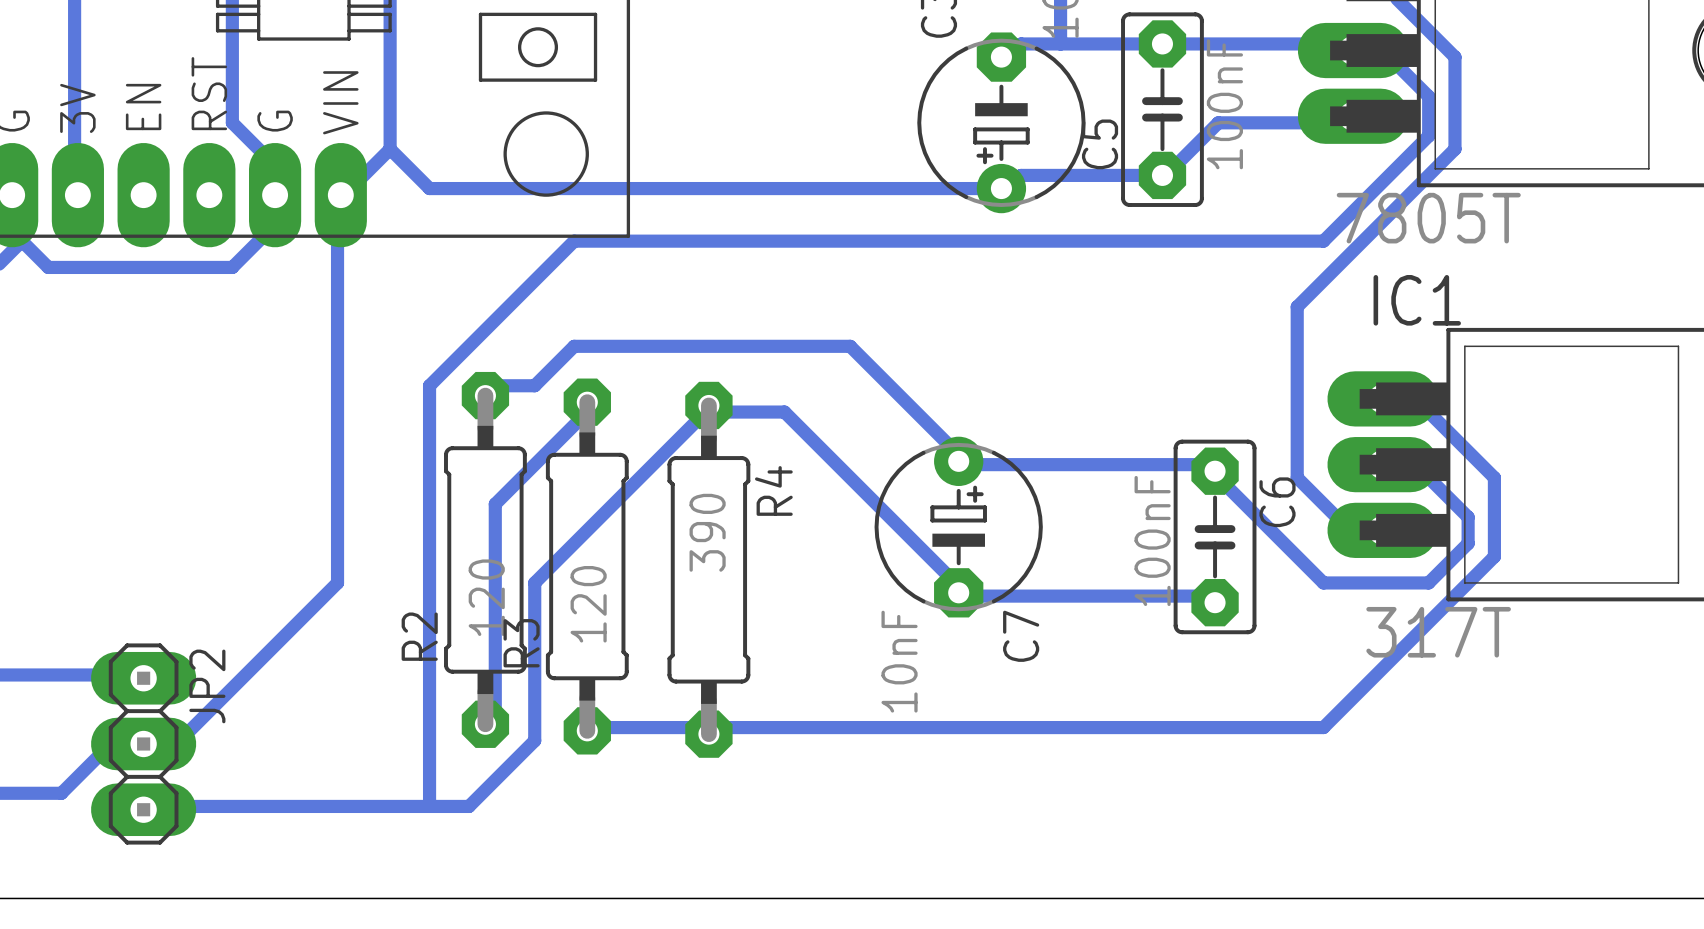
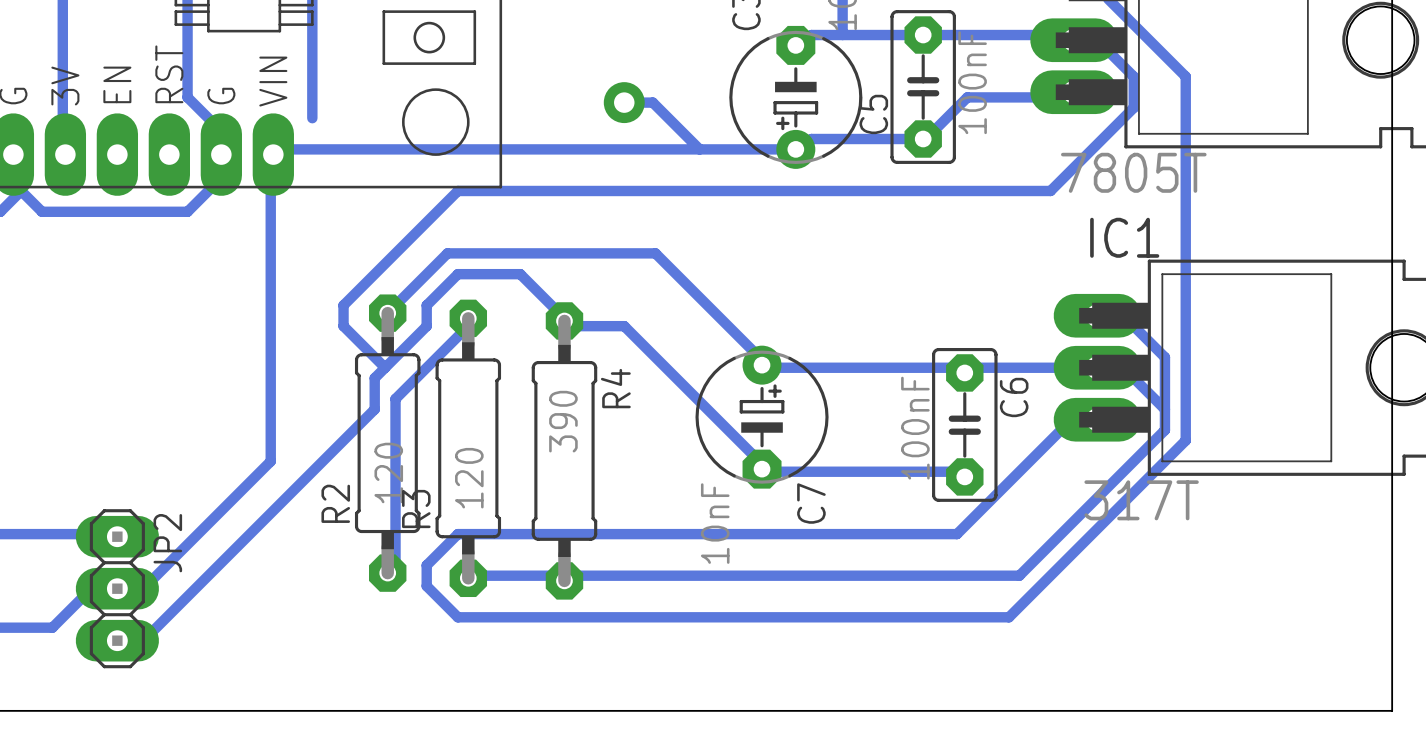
bottom track: (1454, 57) (1454, 149) (1297, 306) (1297, 477) (1349, 530) -> (1154, 45) (1185, 76) (1185, 378)
bottom track: none -> (624, 102) (652, 102) (699, 149)
via: none -> (624, 102)
bottom track: (350, 188) (390, 149) (429, 188) -> (281, 149) (343, 149)
bottom track: (653, 346) (850, 346) -> (520, 274) (561, 315) (564, 320)
bottom track: (495, 385) (534, 385) -> (395, 305) (447, 253) (655, 253) (676, 274)
bottom track: (708, 405) (705, 412) (534, 582) (534, 714) -> (1071, 419) (956, 534) (457, 534) (426, 565)
bottom track: (429, 412) (429, 806) -> (343, 326) (385, 367)
bottom track: (1468, 451) (1494, 477) -> (1164, 357) (1164, 409)
bottom track: (1215, 471) (1218, 477) (1323, 582) (1428, 582) -> (964, 372) (967, 367) (1097, 367)
bottom track: (1284, 727) (1323, 727) -> (1019, 575) (1133, 461)
bottom track: none -> (1050, 575) (1008, 617) (457, 617) (426, 586)
bottom track: (534, 740) (468, 806) (179, 806) -> (426, 305) (426, 326) (374, 378) (374, 409) (145, 638)

